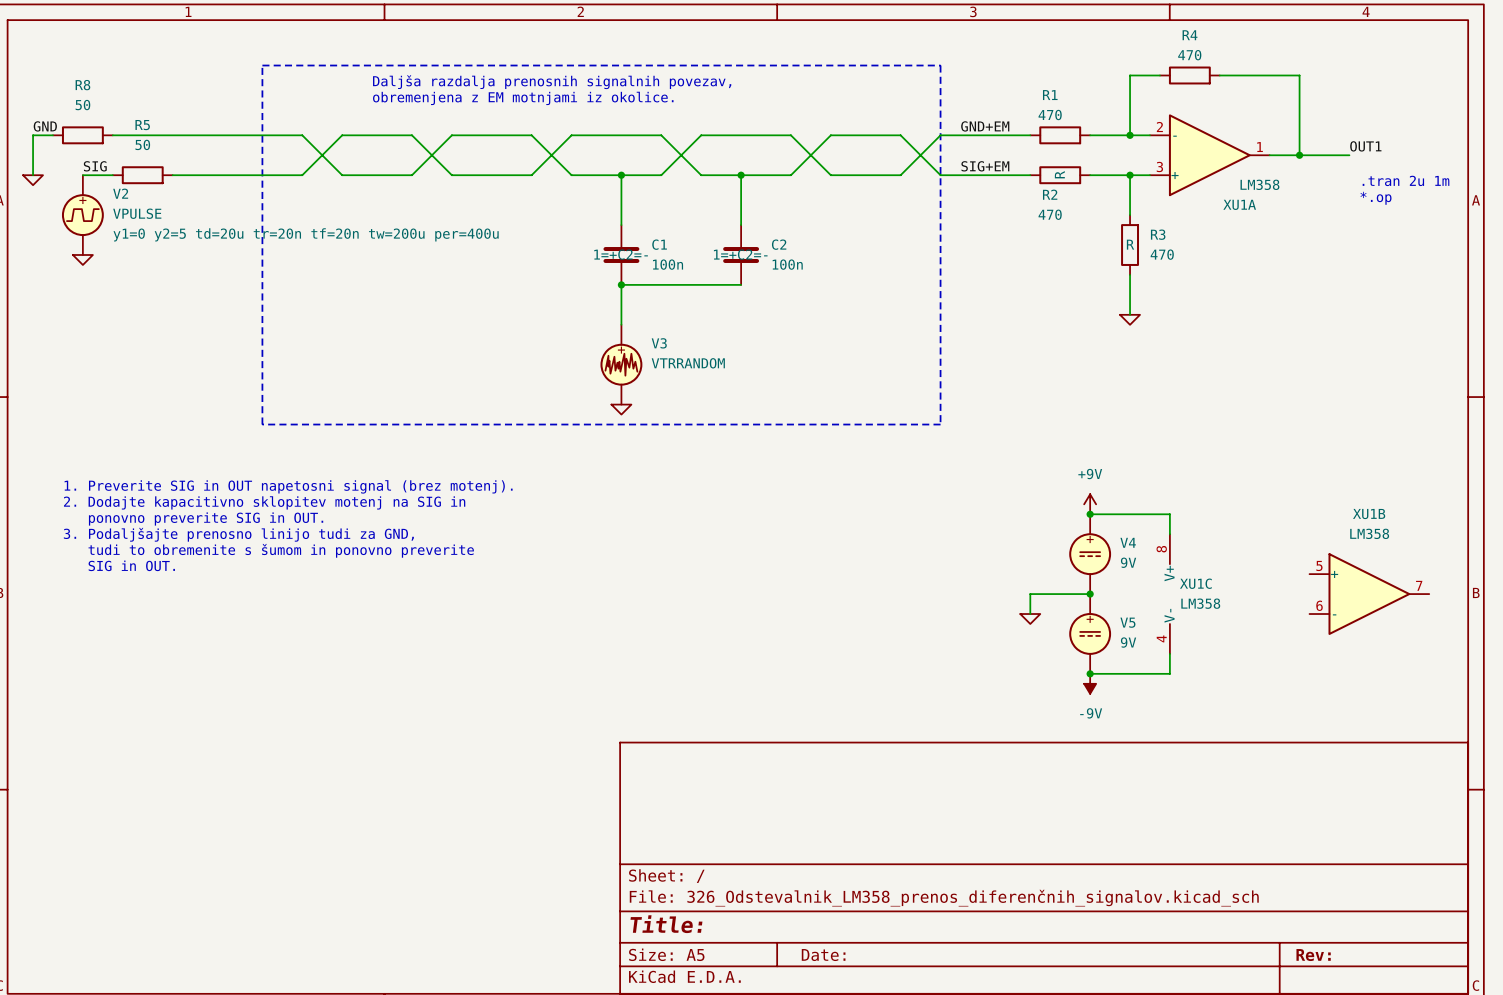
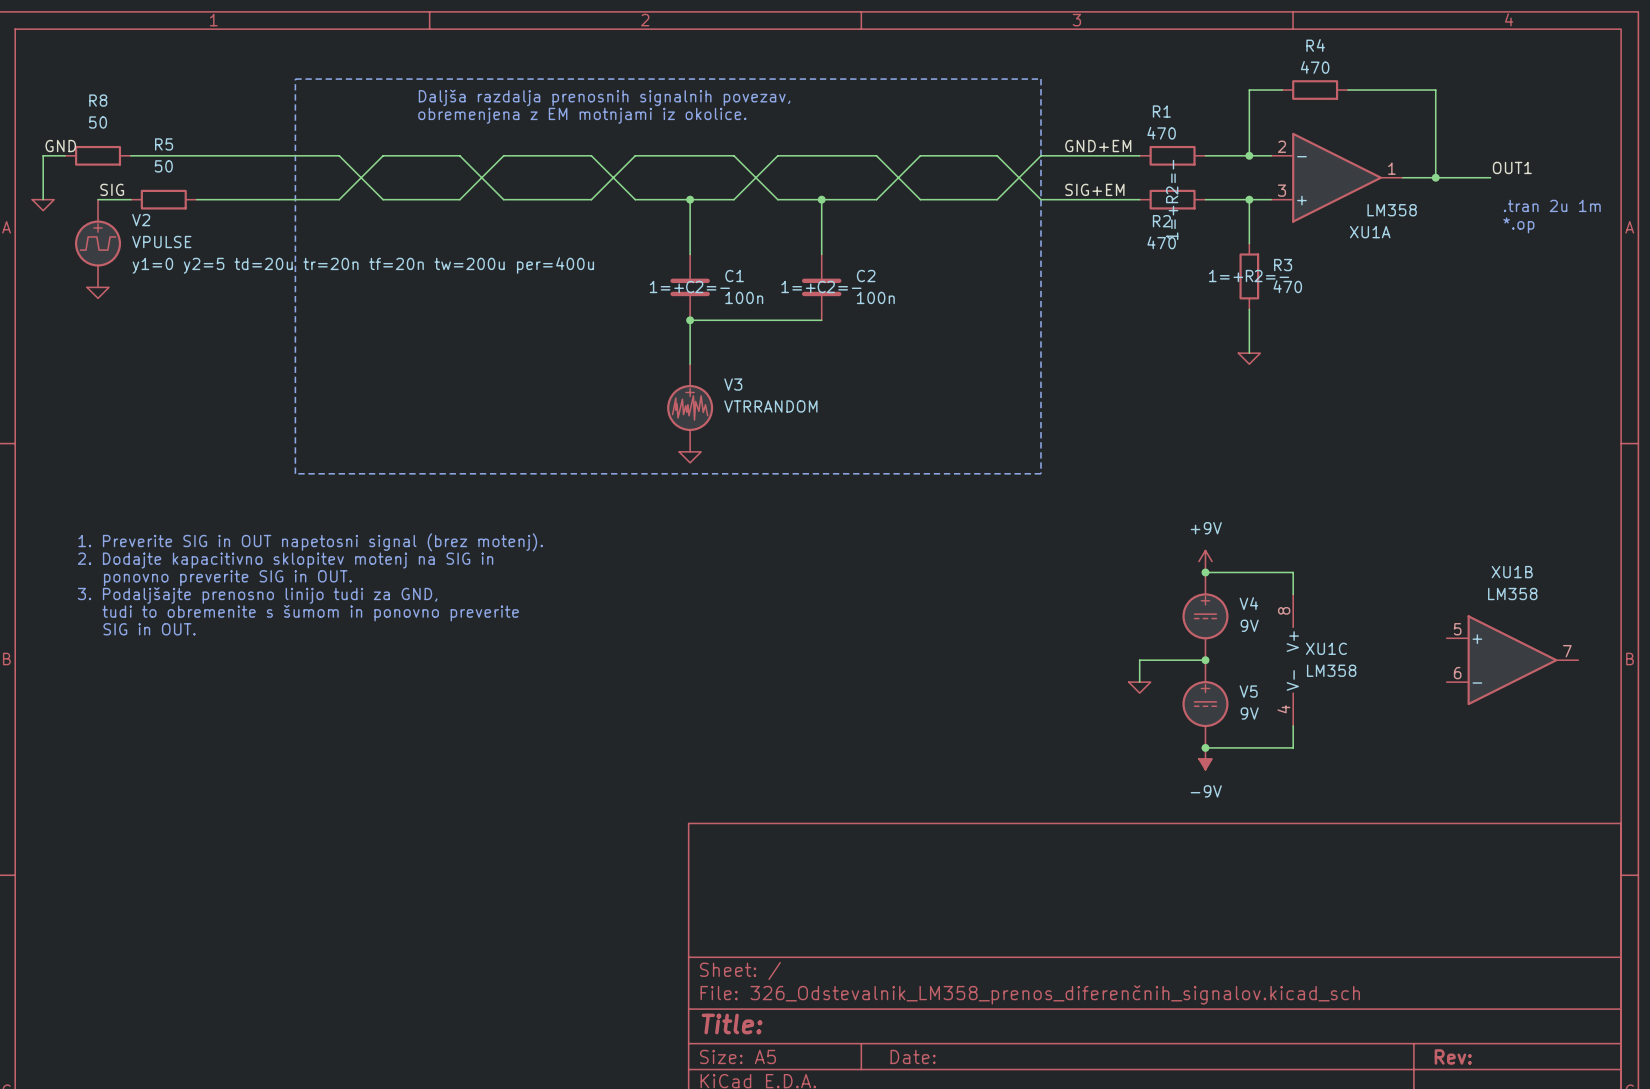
R2 text: none -> 1=+ 2=- (1172, 199)
R3 text: none -> 1=+ 2=- (1249, 276)

